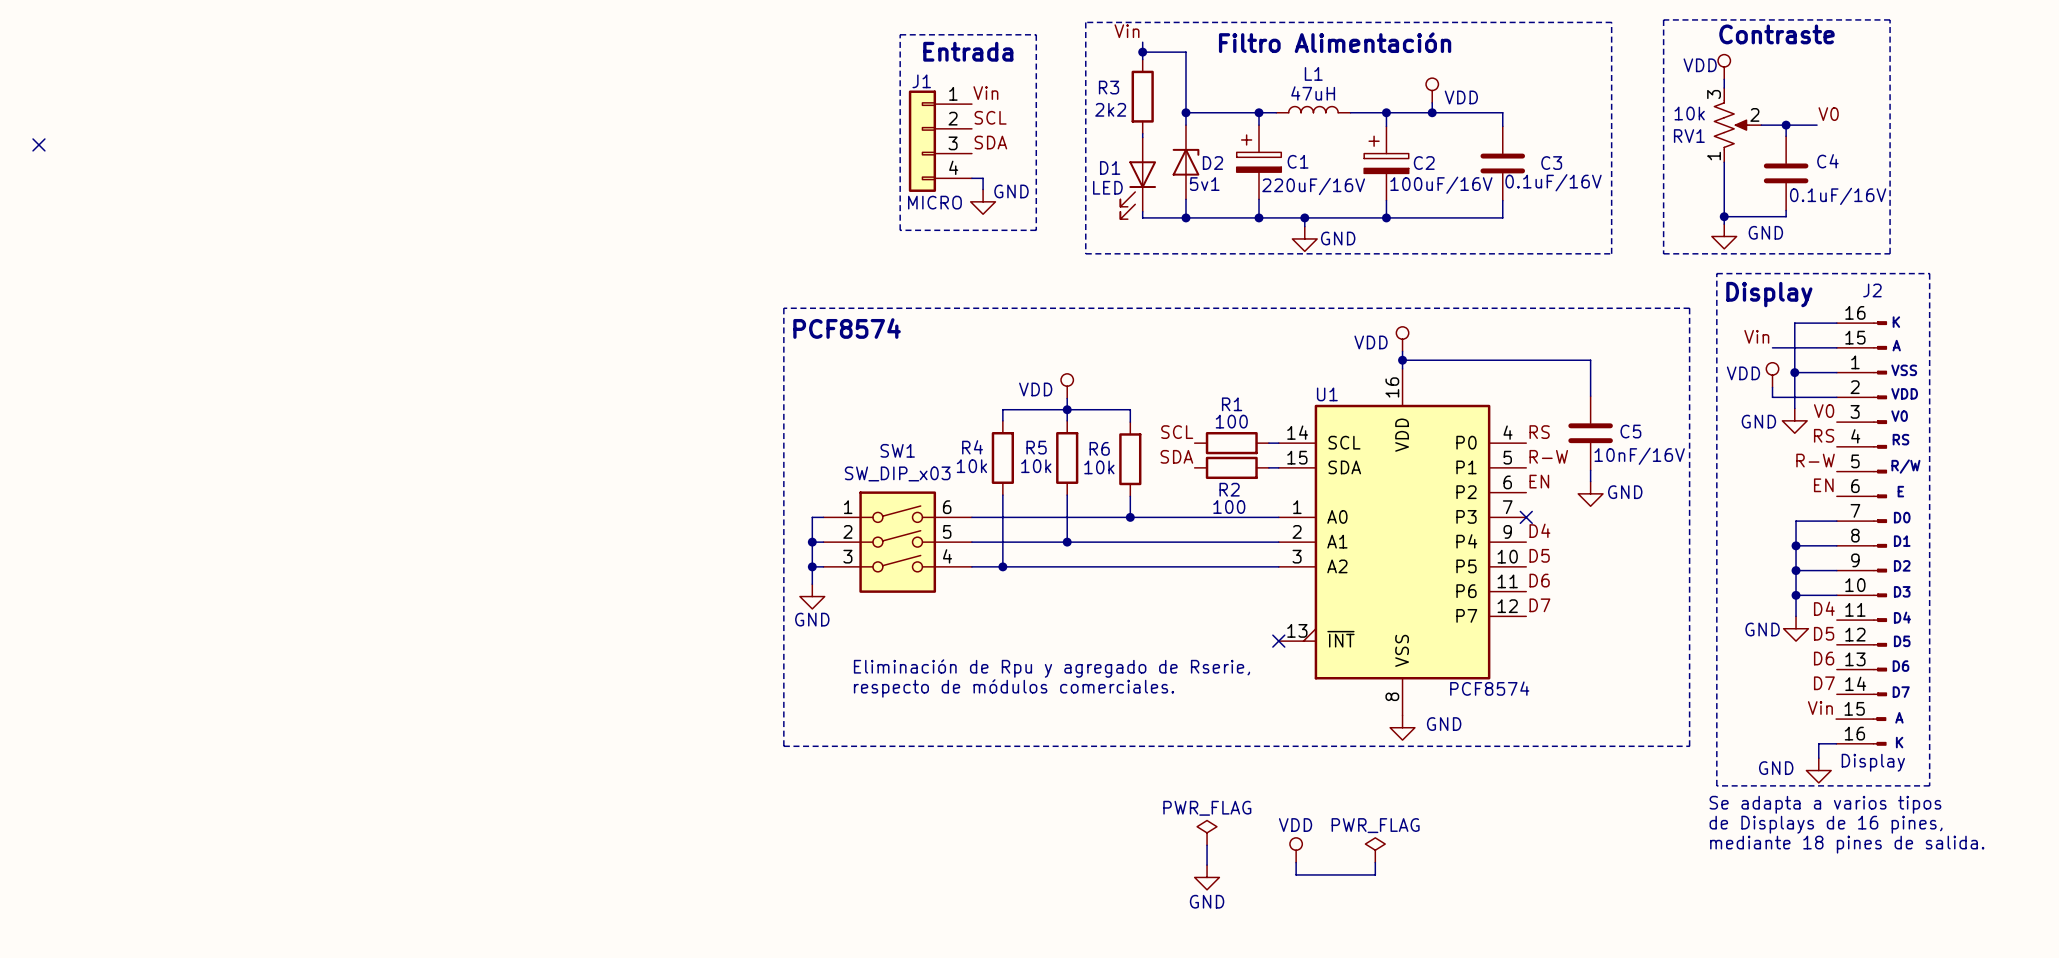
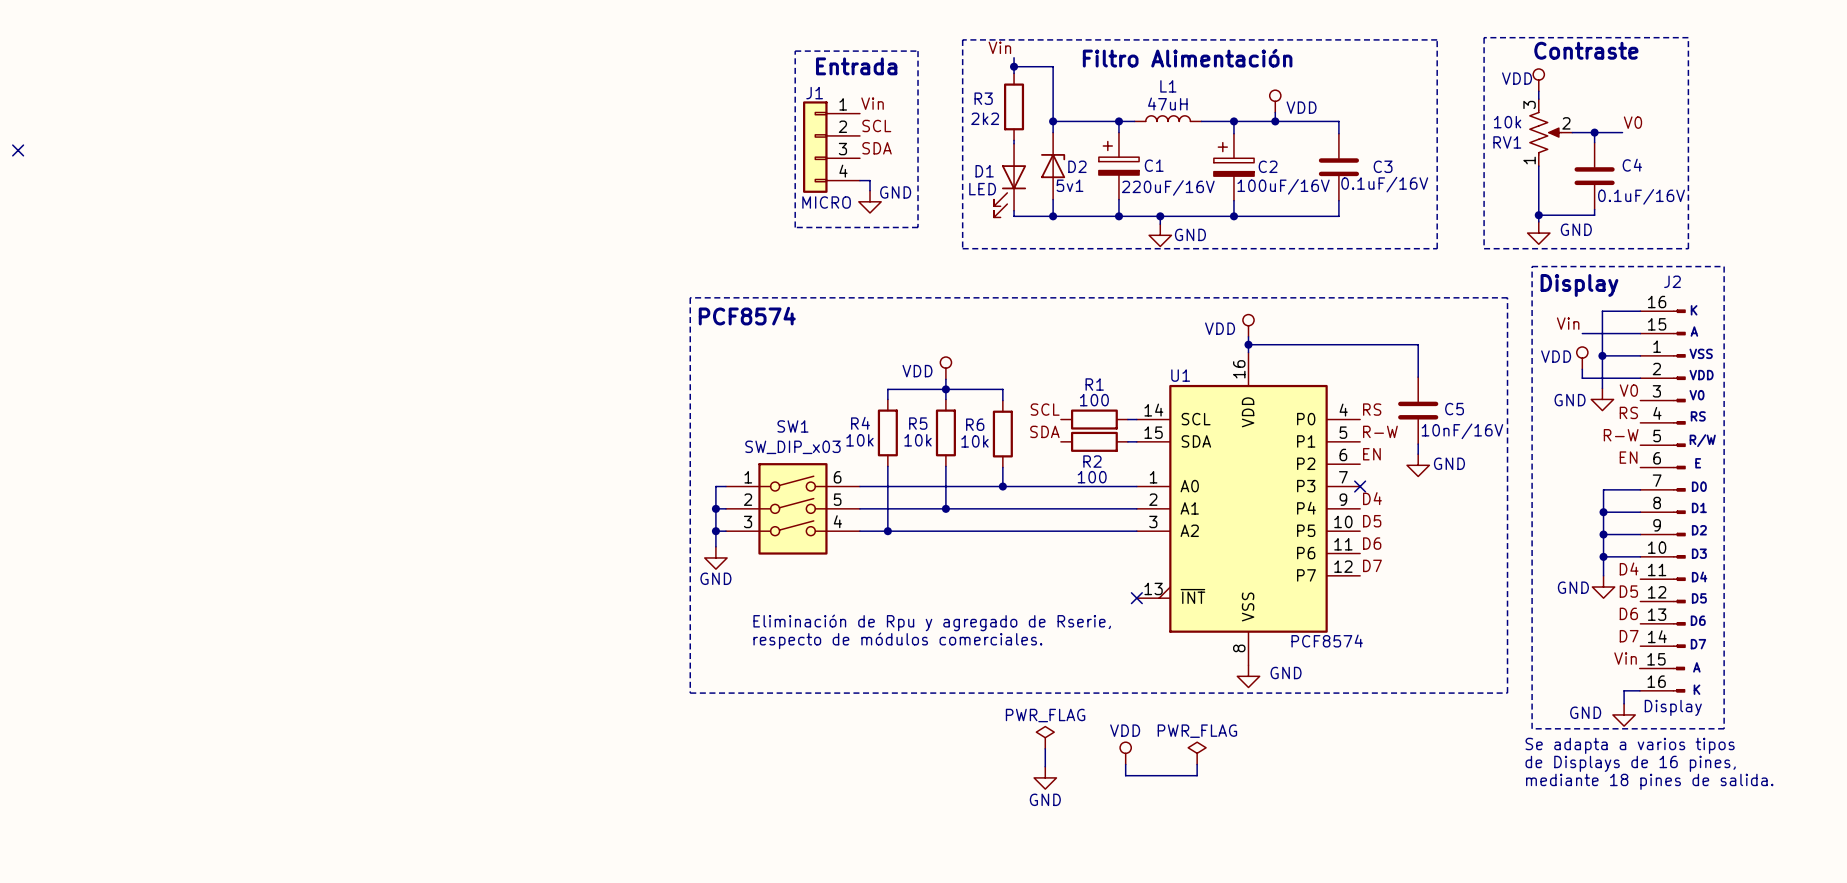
power symbol position: PWR_FLAG (1207, 832) -> PWR_FLAG (1045, 737)
wire: (1207, 845) (1207, 865) -> (1045, 748) (1045, 766)
power symbol position: VDD (1296, 850) -> VDD (1125, 753)
power symbol position: PWR_FLAG (1375, 850) -> PWR_FLAG (1197, 753)
wire: (1296, 862) (1296, 874) (1375, 874) (1375, 862) -> (1125, 764) (1125, 775) (1197, 775) (1197, 764)
power symbol position: GND (1207, 877) -> GND (1045, 777)

